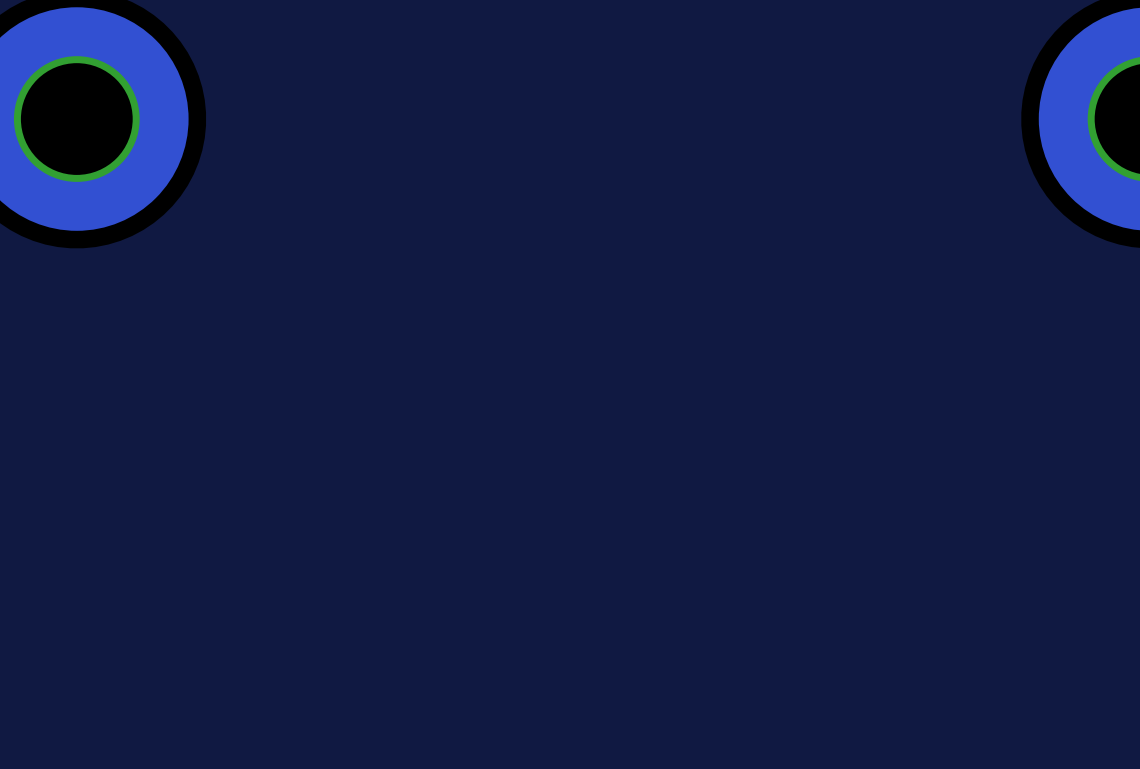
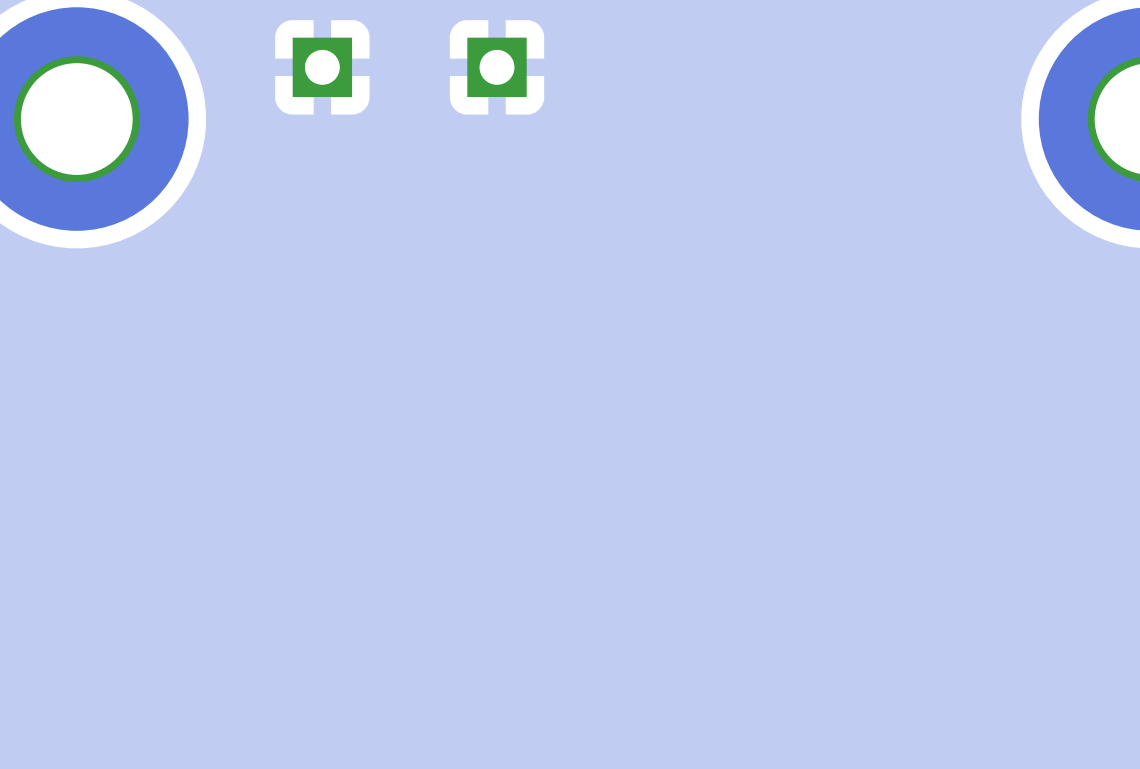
part: none -> (322, 67)
part: none -> (497, 67)

